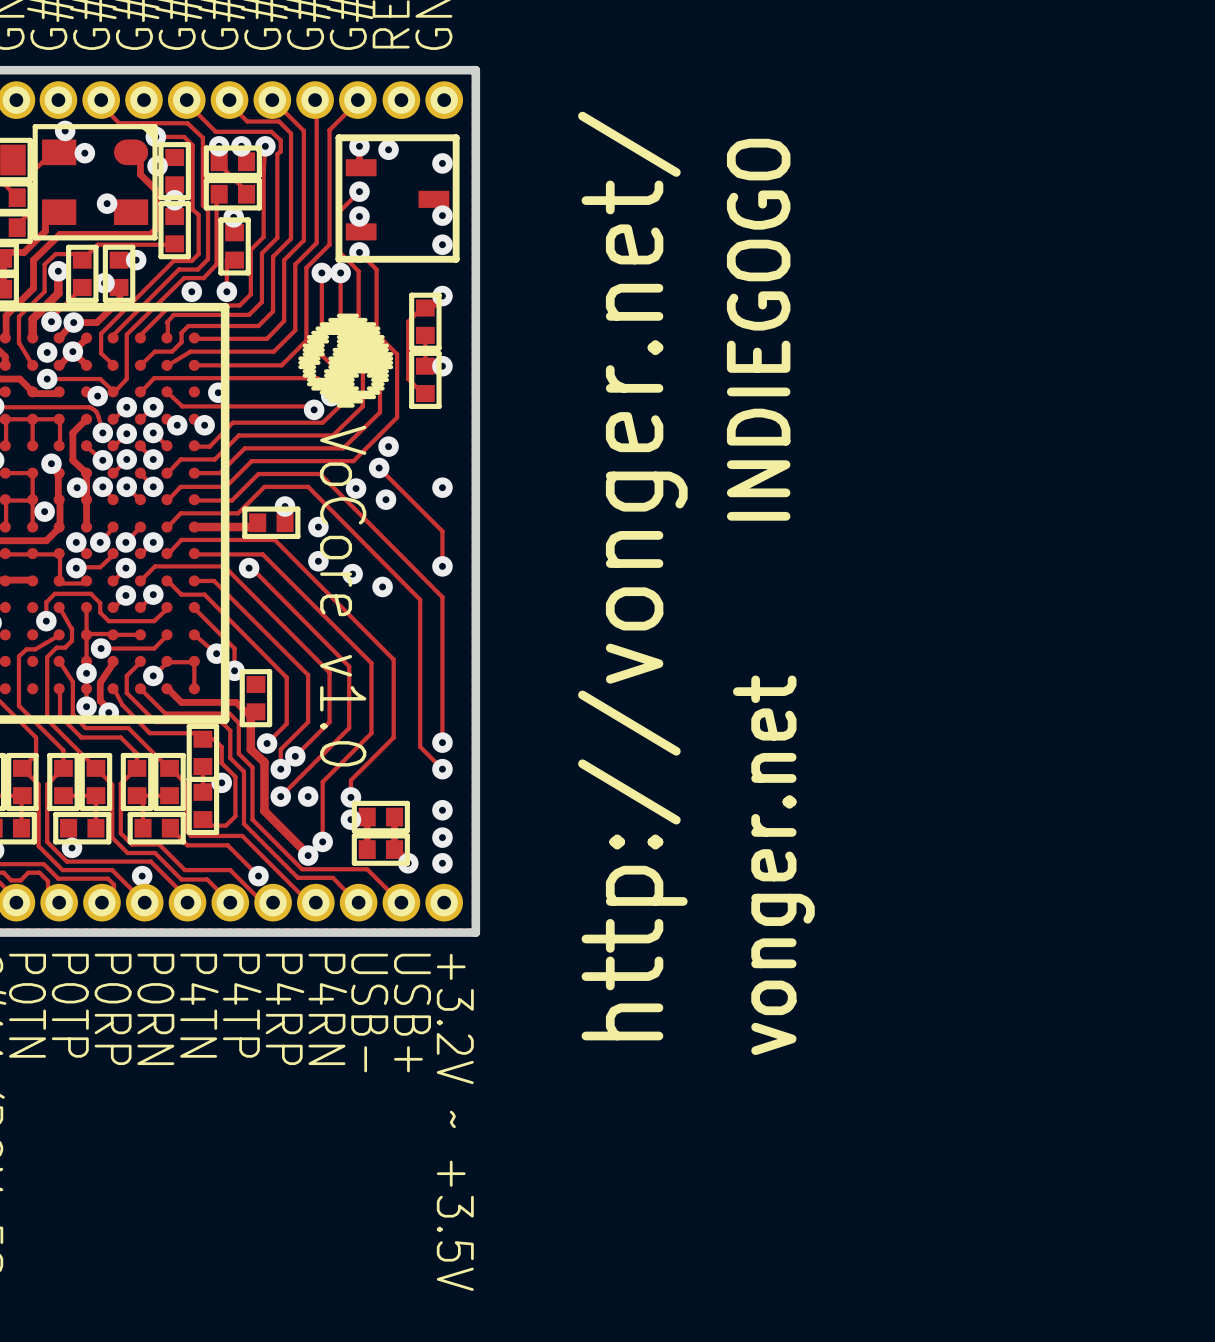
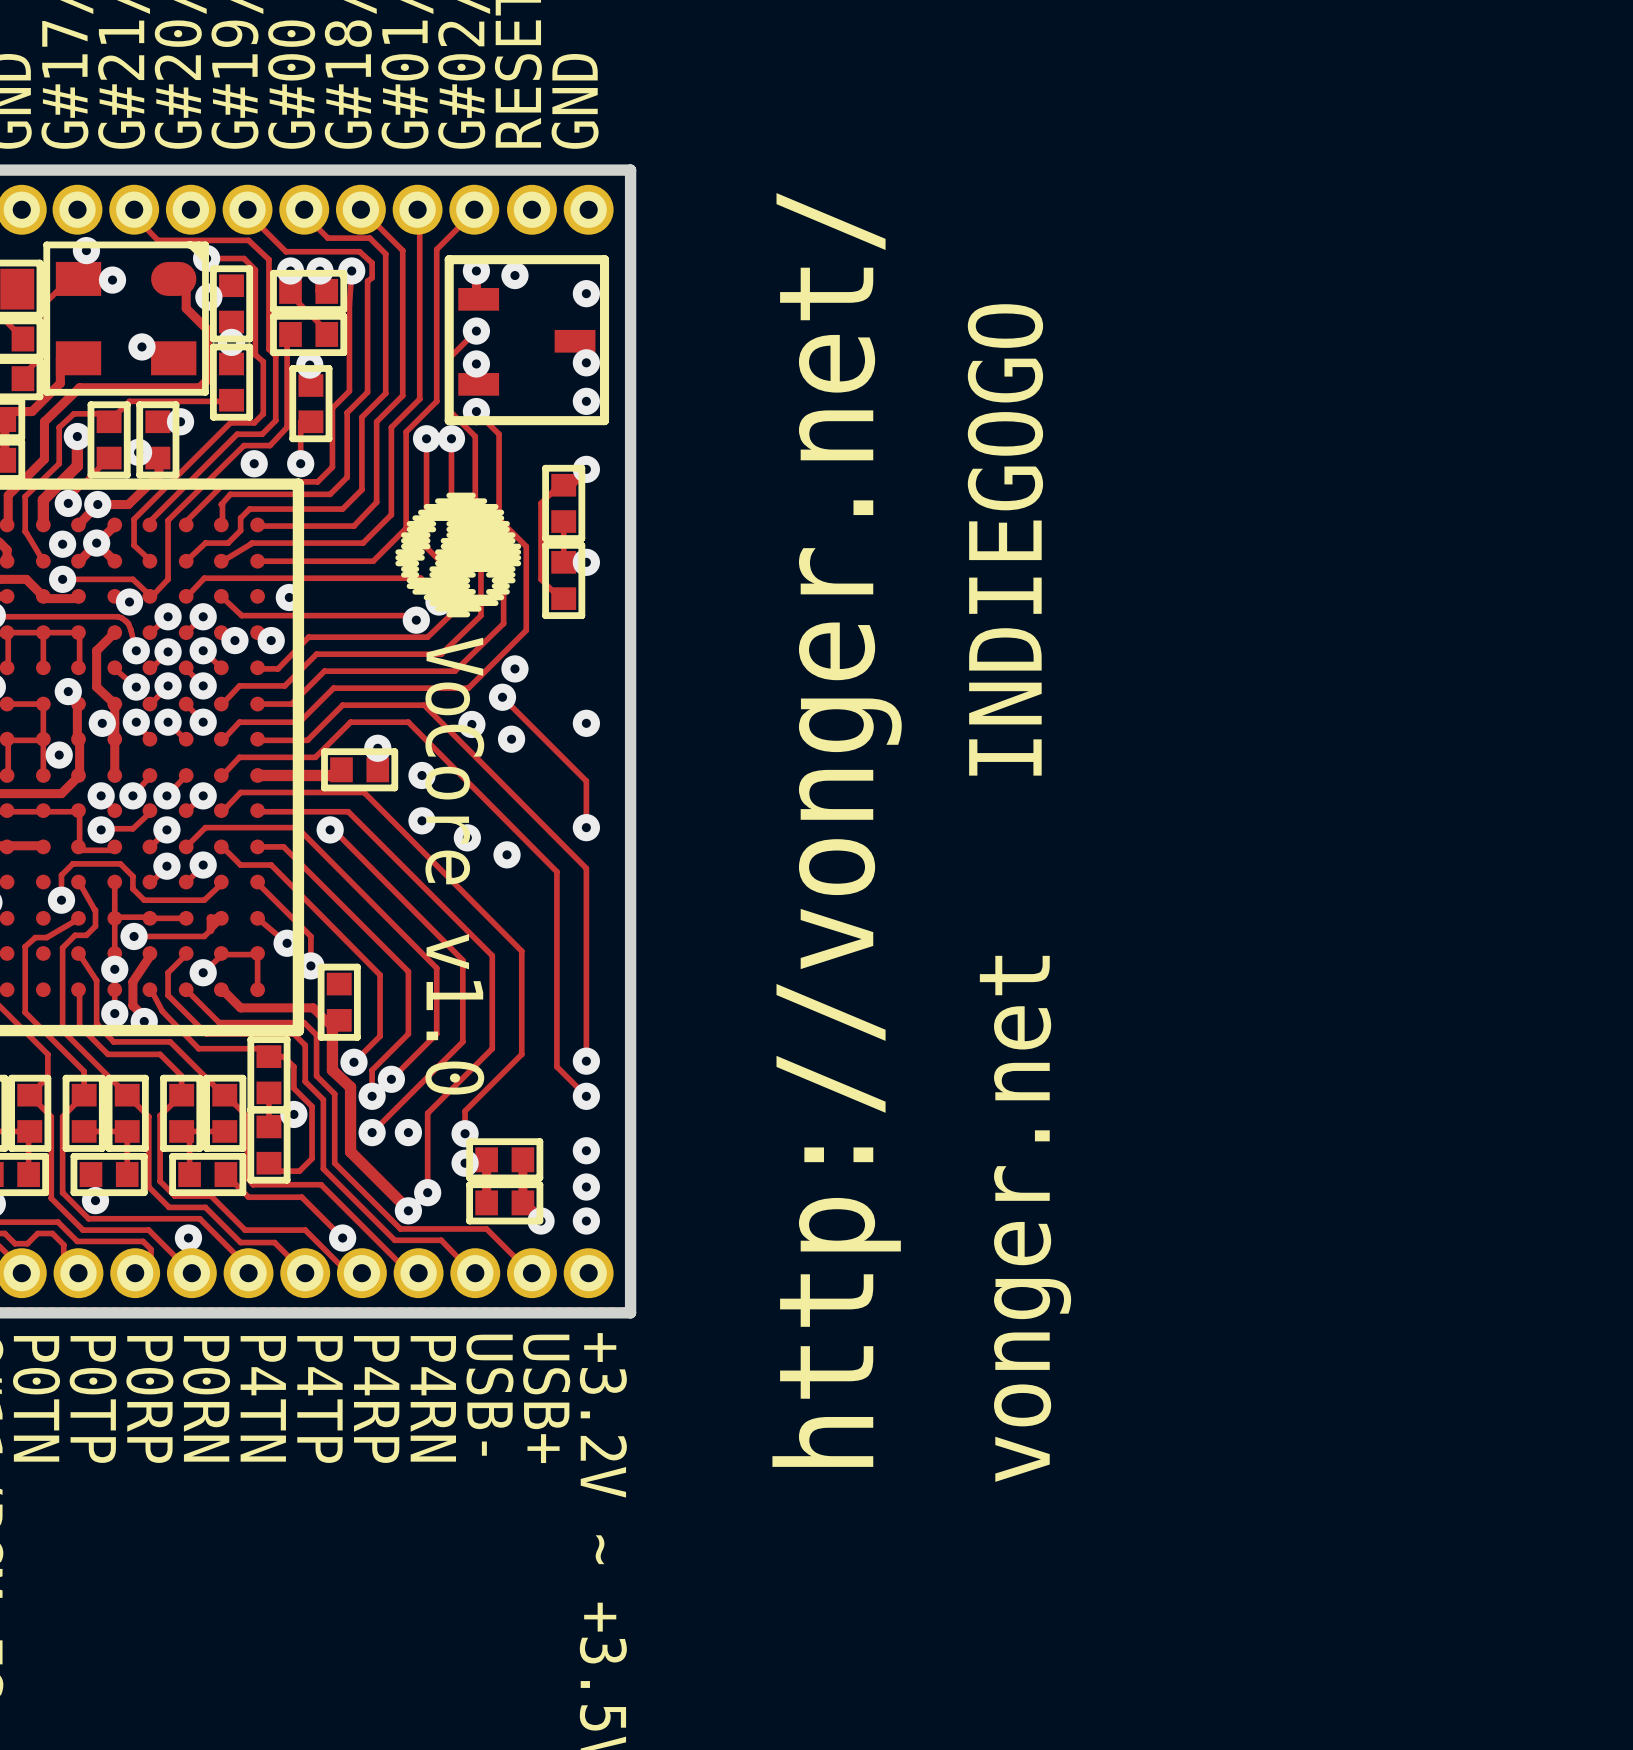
track: none -> (221, 918) (210, 918) (210, 930)

